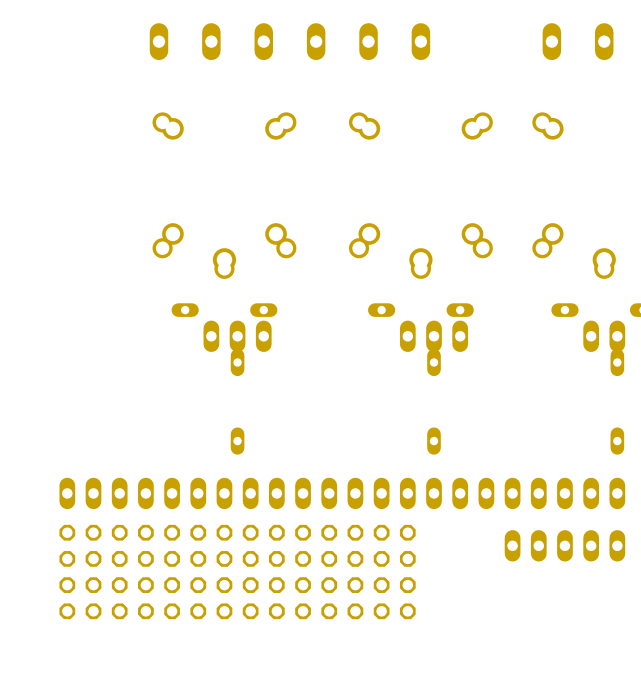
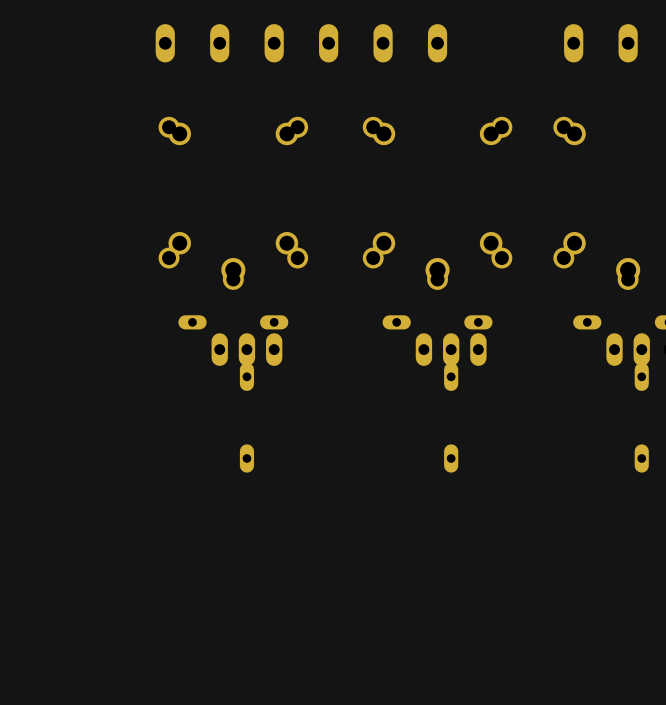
part: (342, 493) -> none
part: (145, 545) -> none
part: (329, 545) -> none
part: (564, 545) -> none
part: (145, 598) -> none
part: (329, 598) -> none

